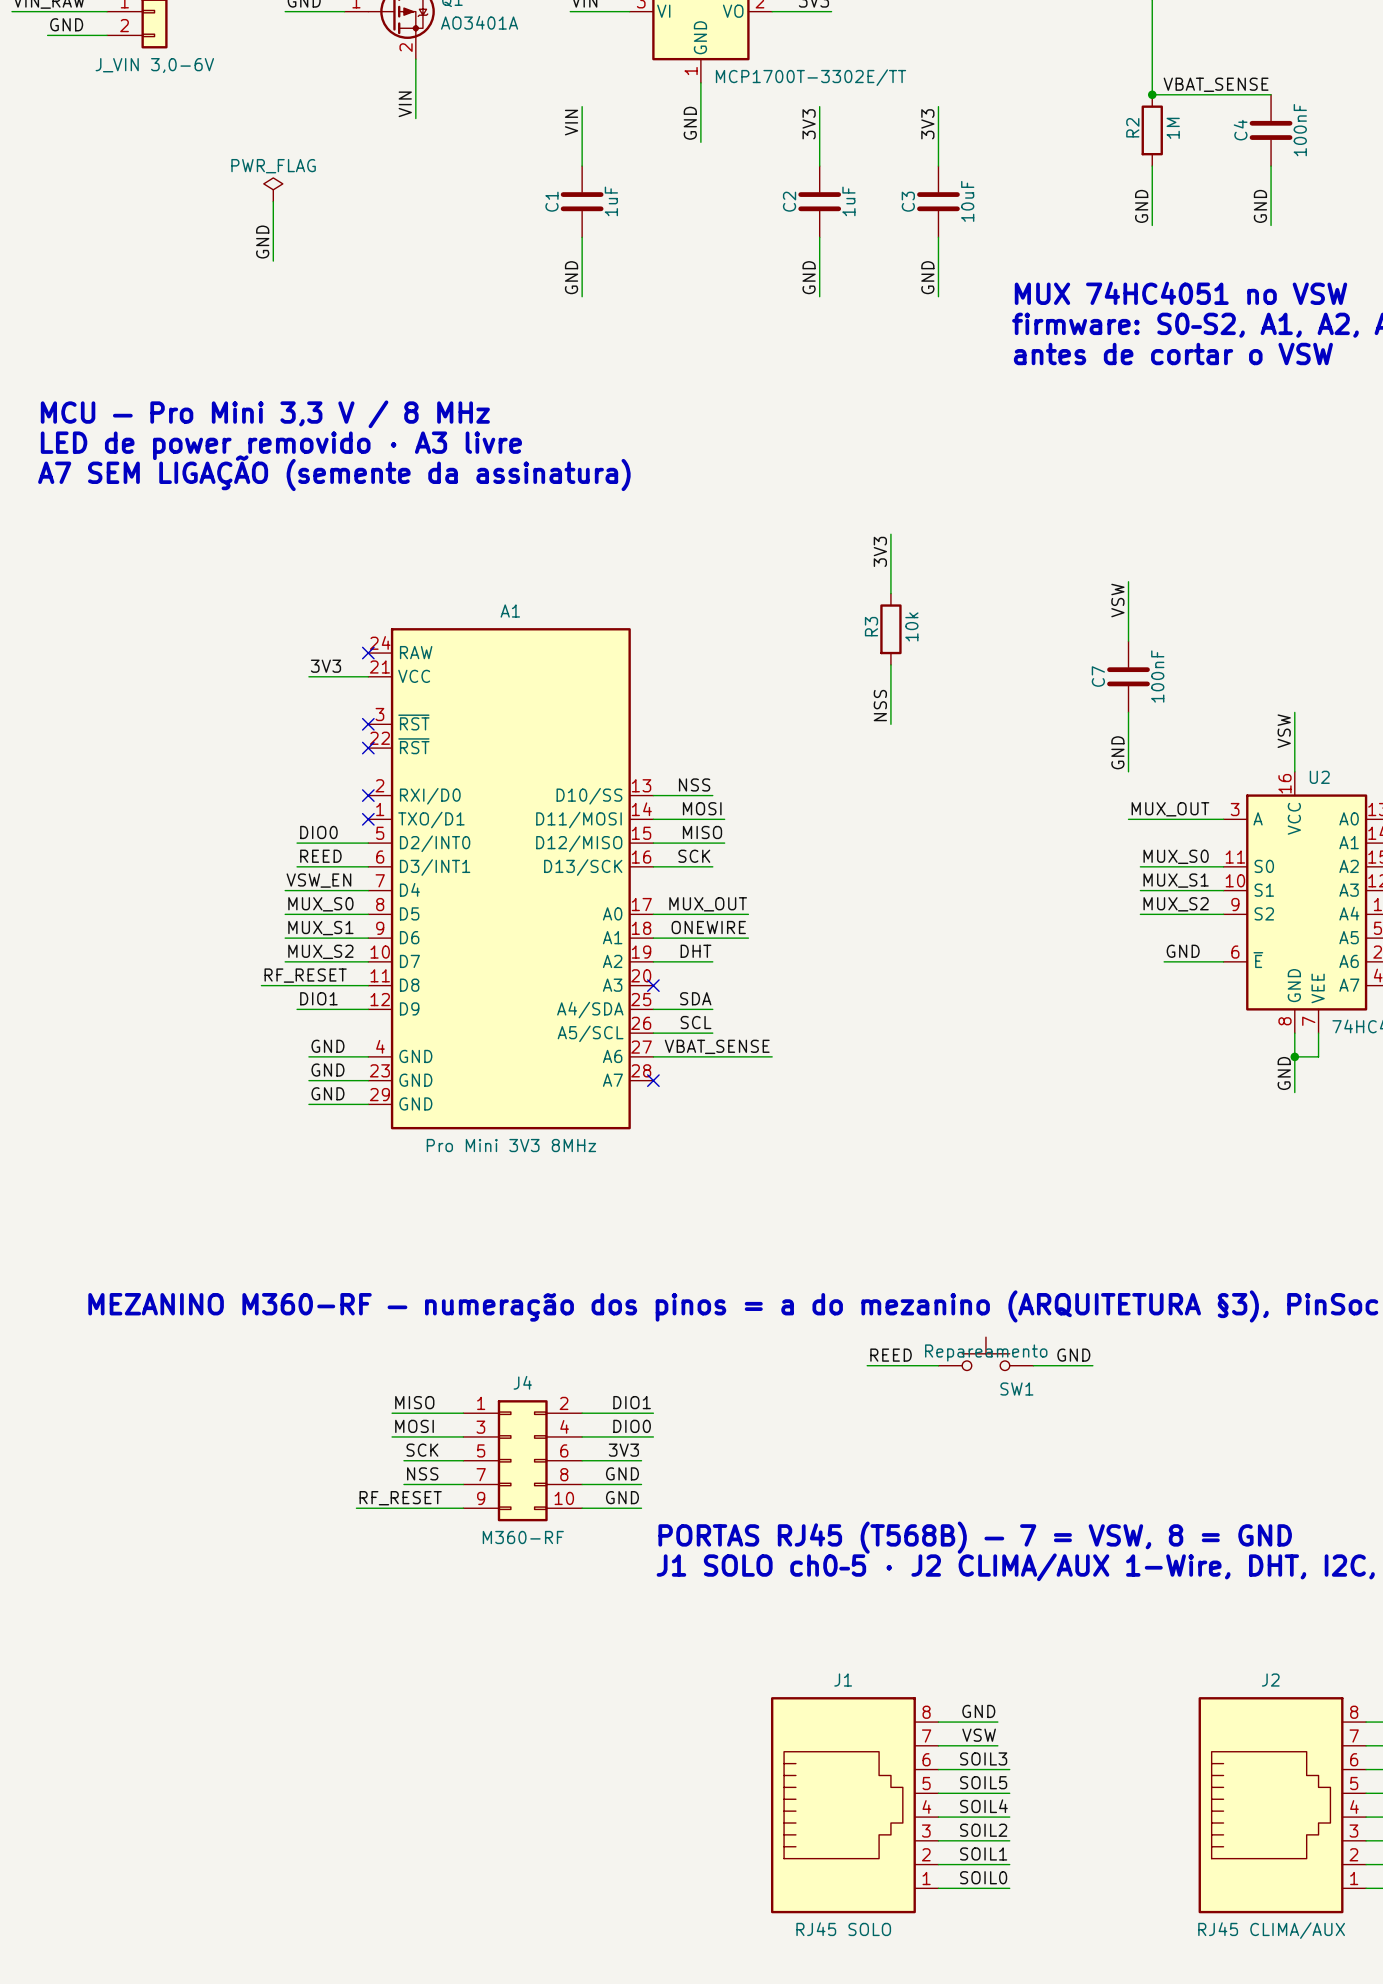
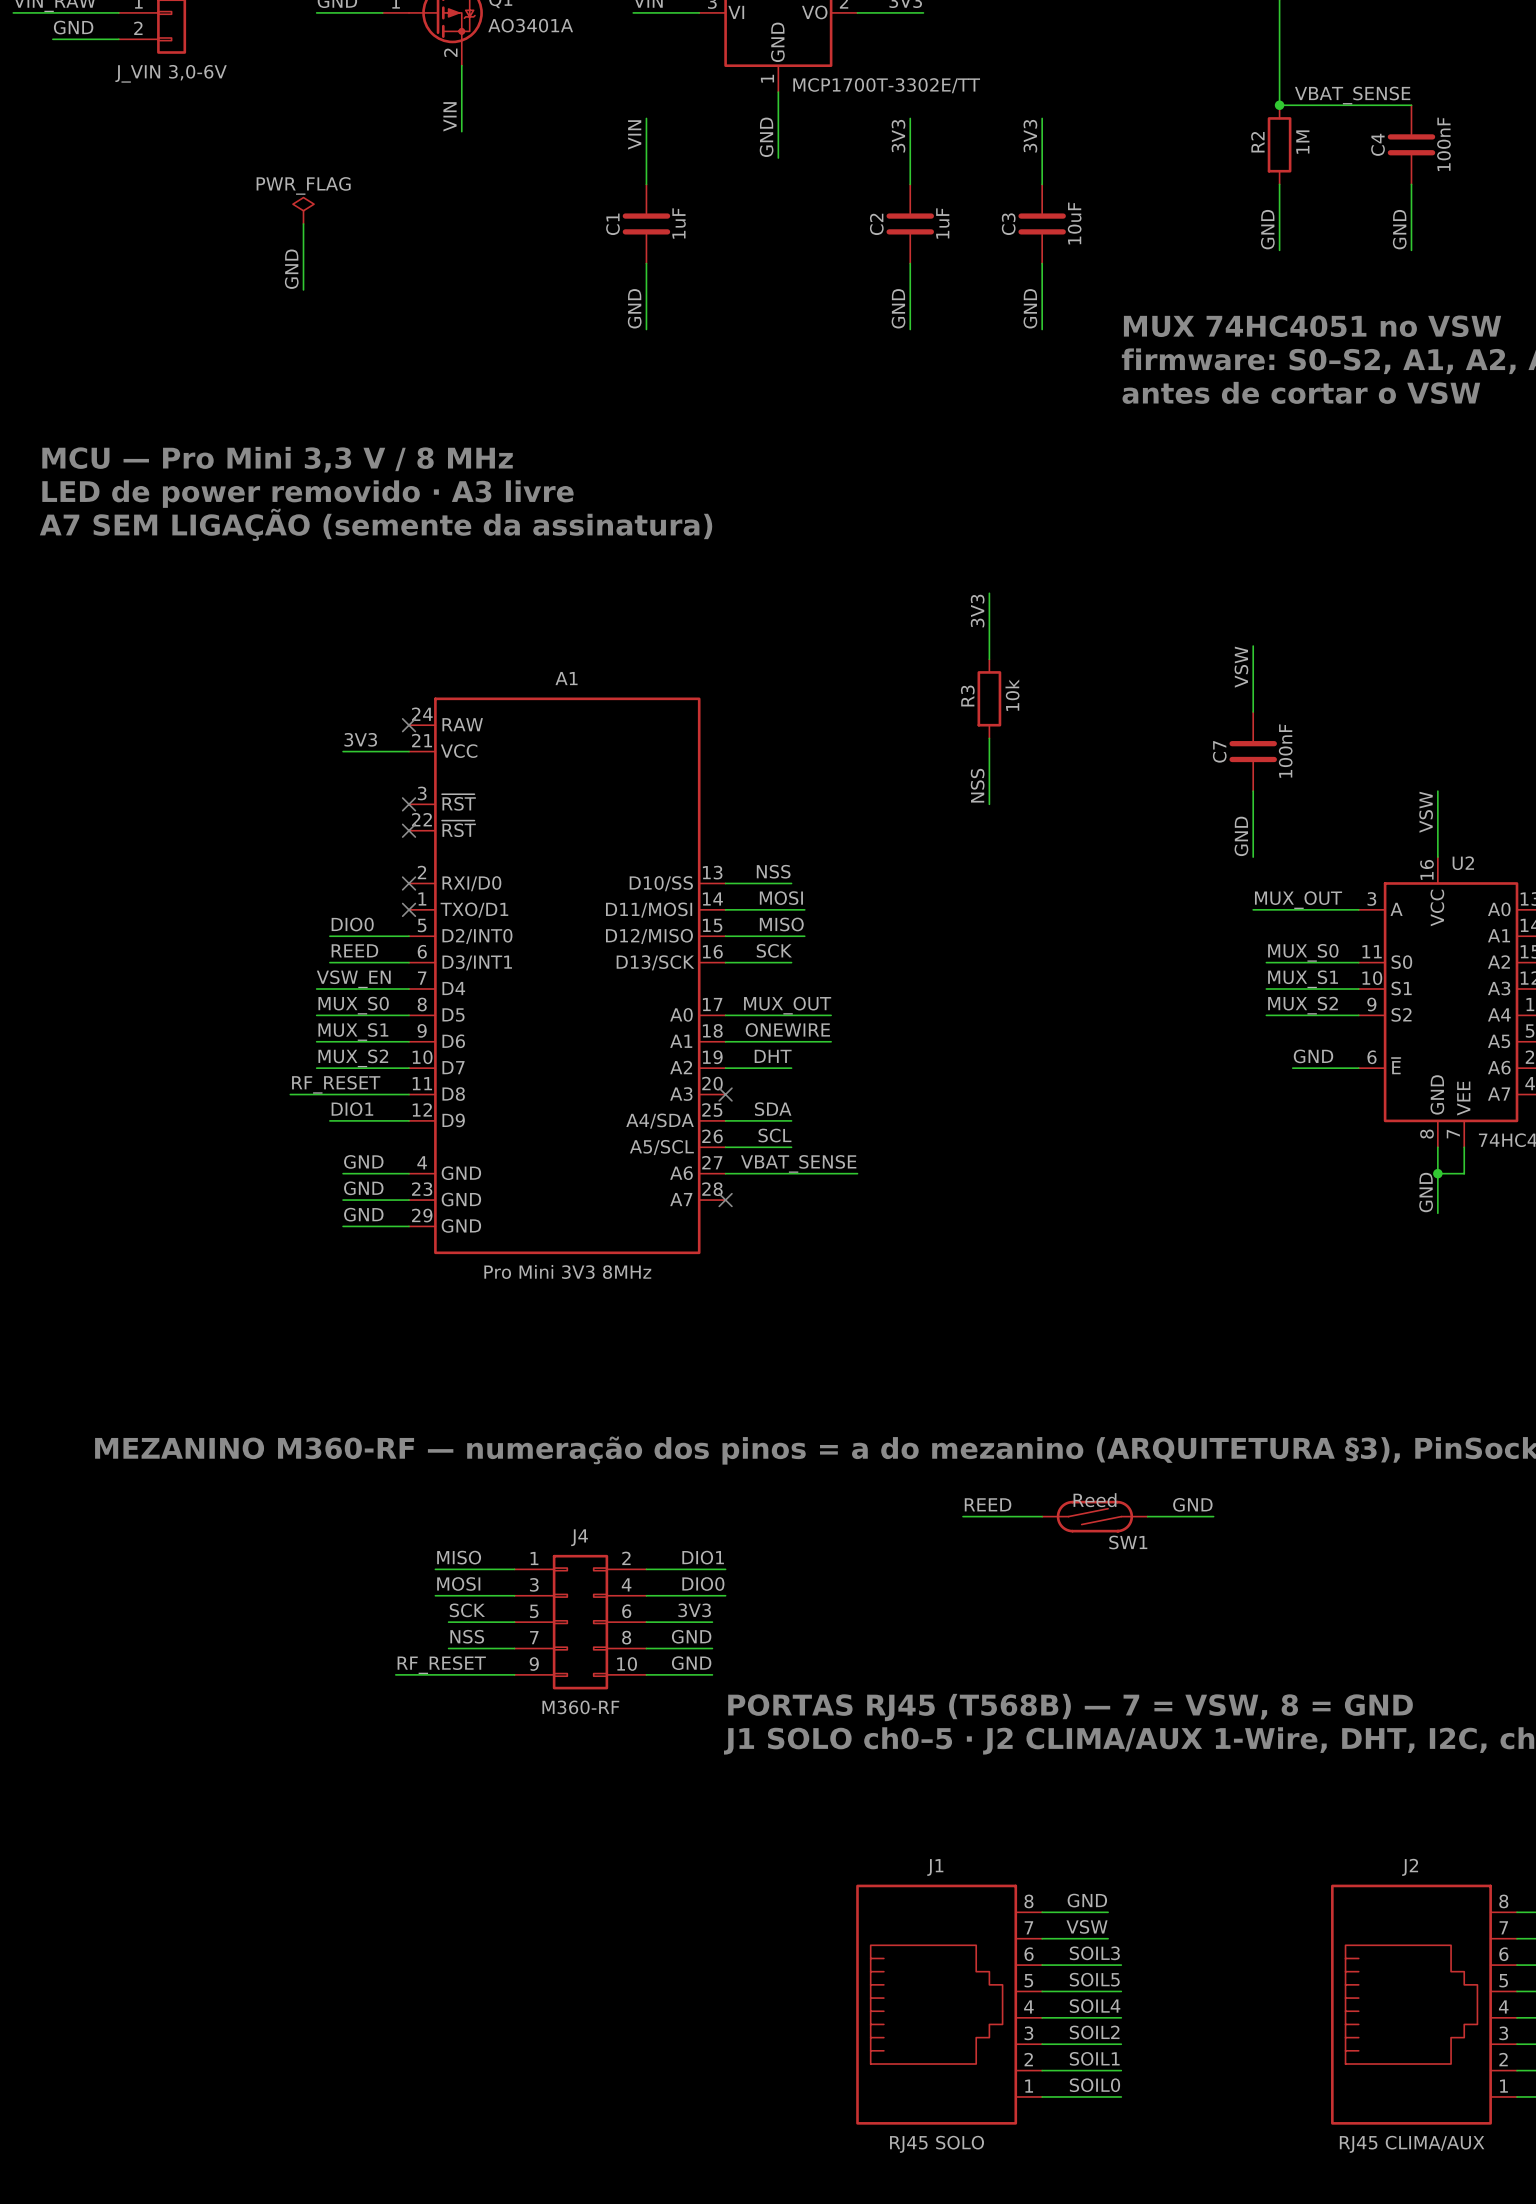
SW1 symbol: [938, 1337, 1034, 1371] -> [1042, 1500, 1148, 1533]
SW1 value: Repareamento (986, 1352) -> Reed (1094, 1500)

